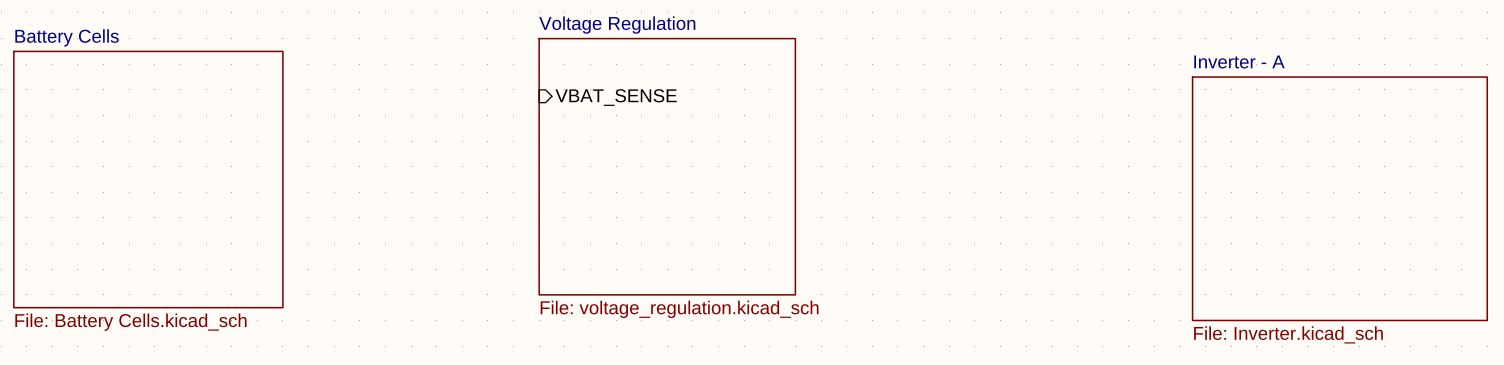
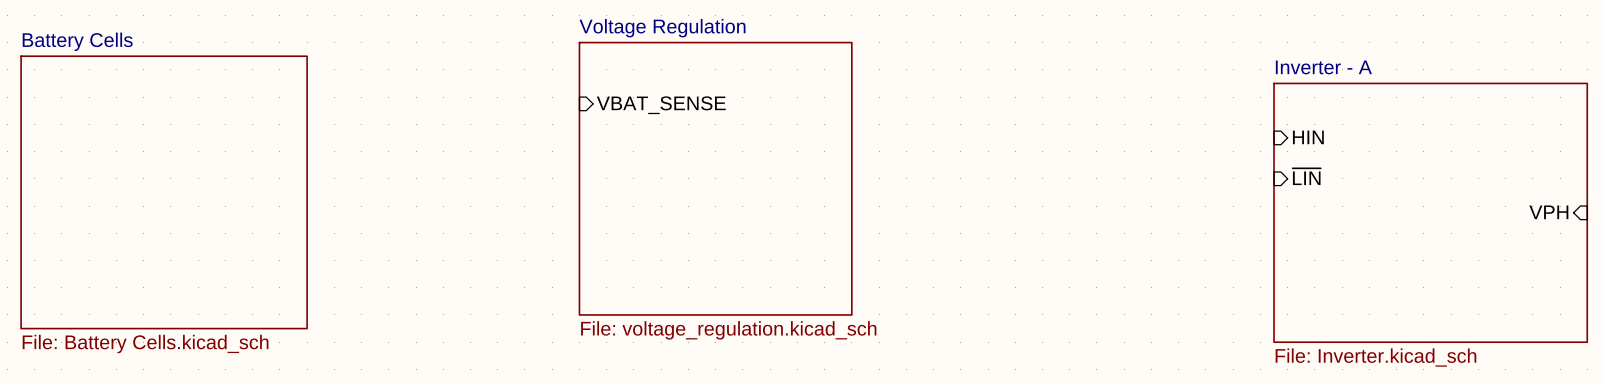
sheet pin: none -> HIN (1308, 137)
sheet pin: none -> ~{LIN} (1306, 176)
sheet pin: none -> VPH (1548, 212)

